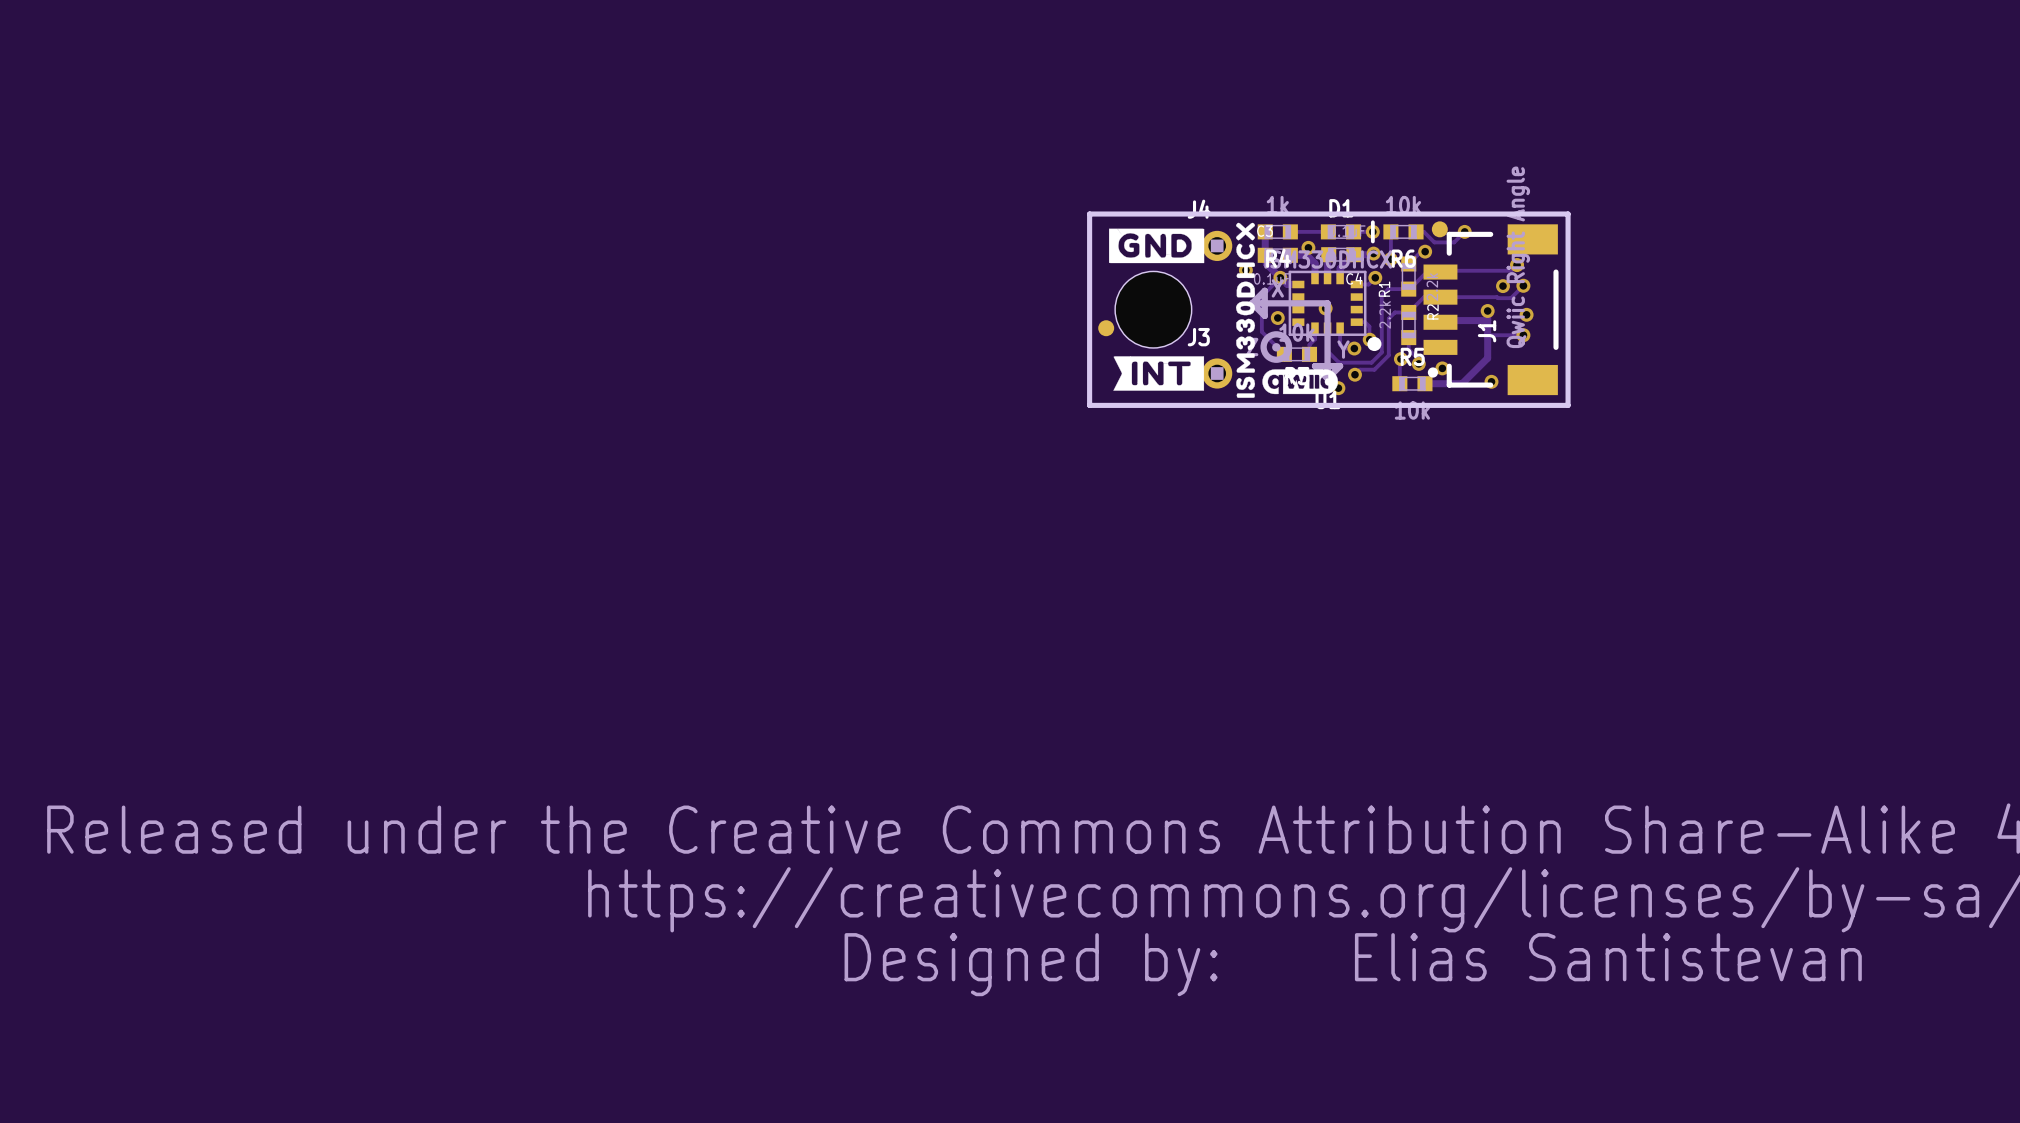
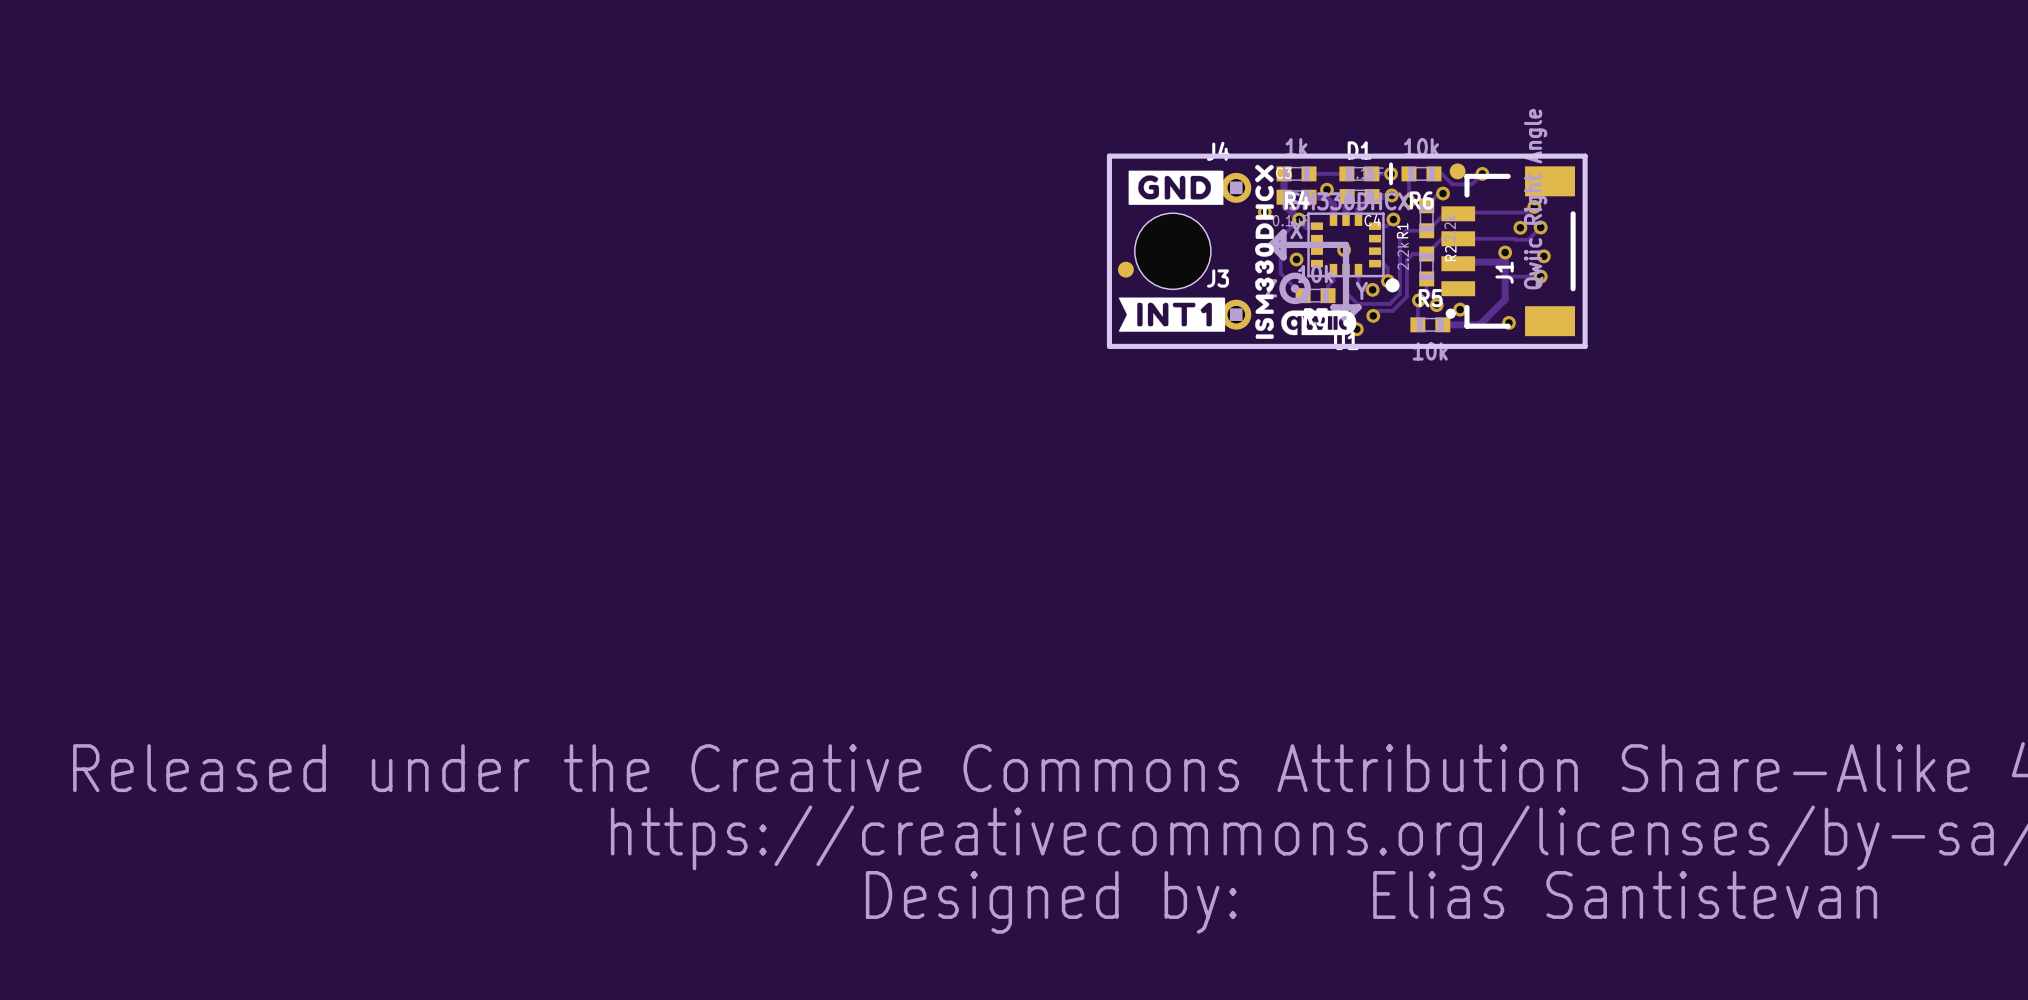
drawing shape: [1113, 356, 1205, 391] -> [1118, 297, 1226, 332]

